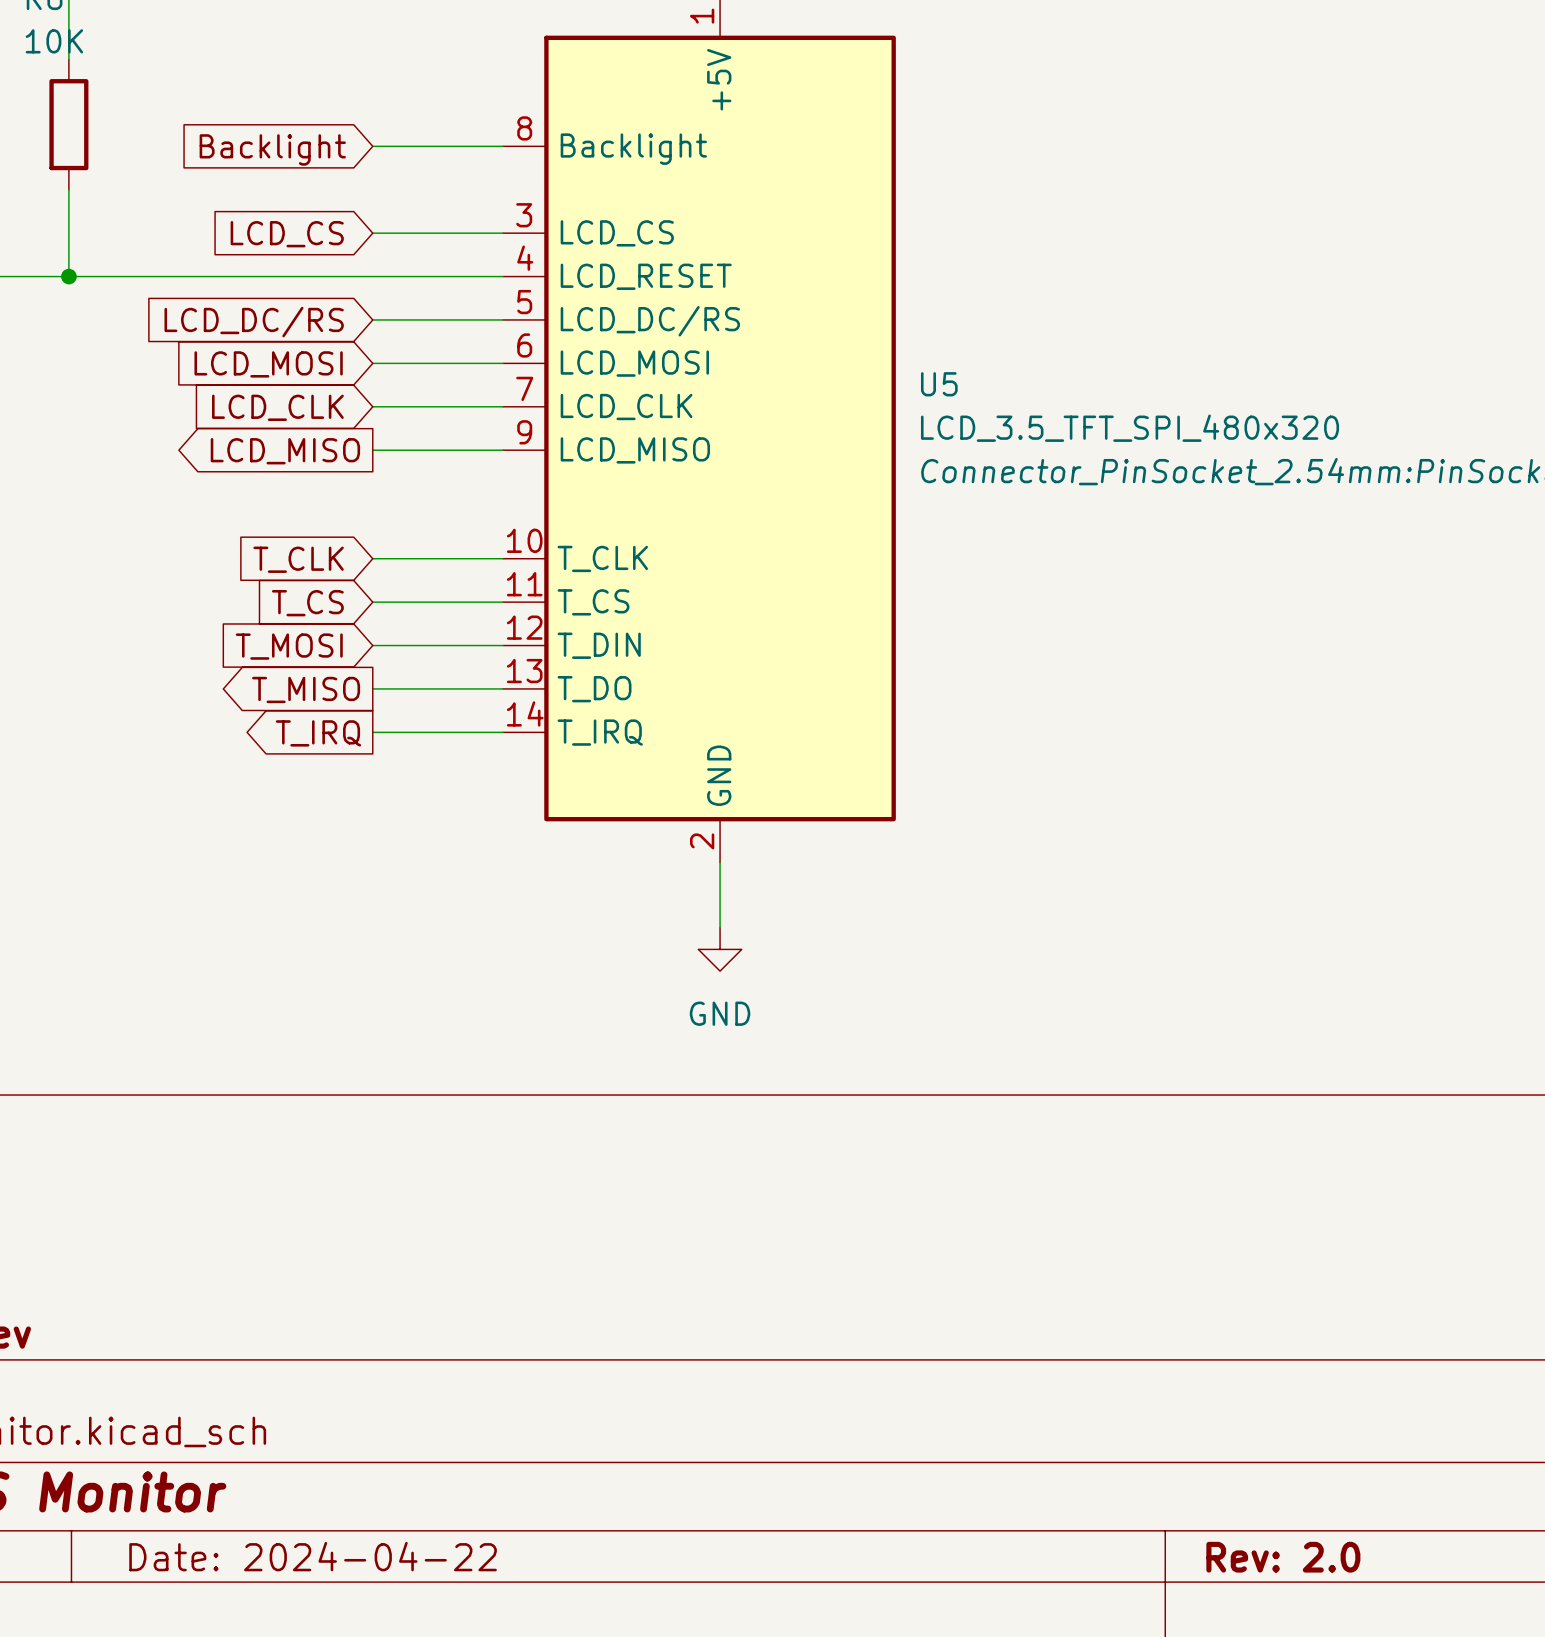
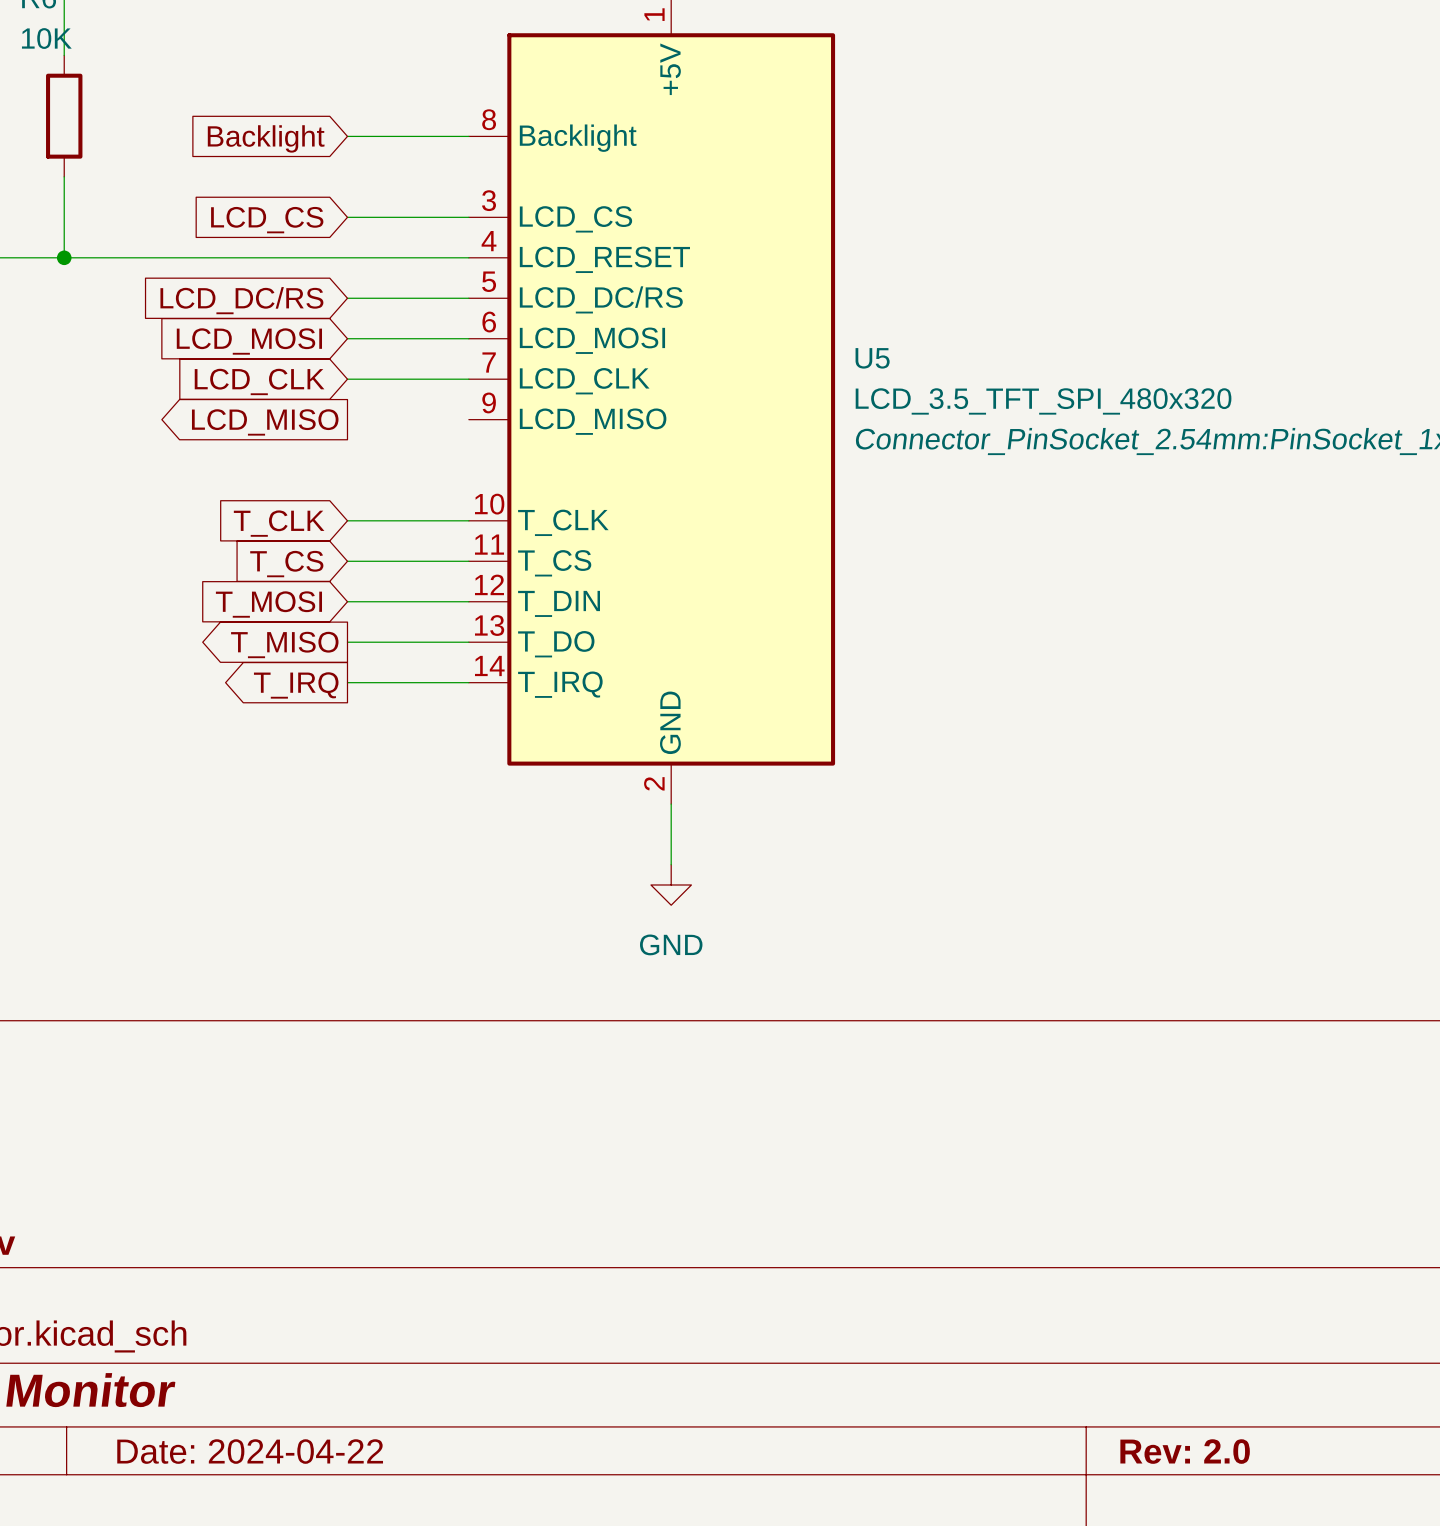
wire: (372, 450) (503, 450) -> none

